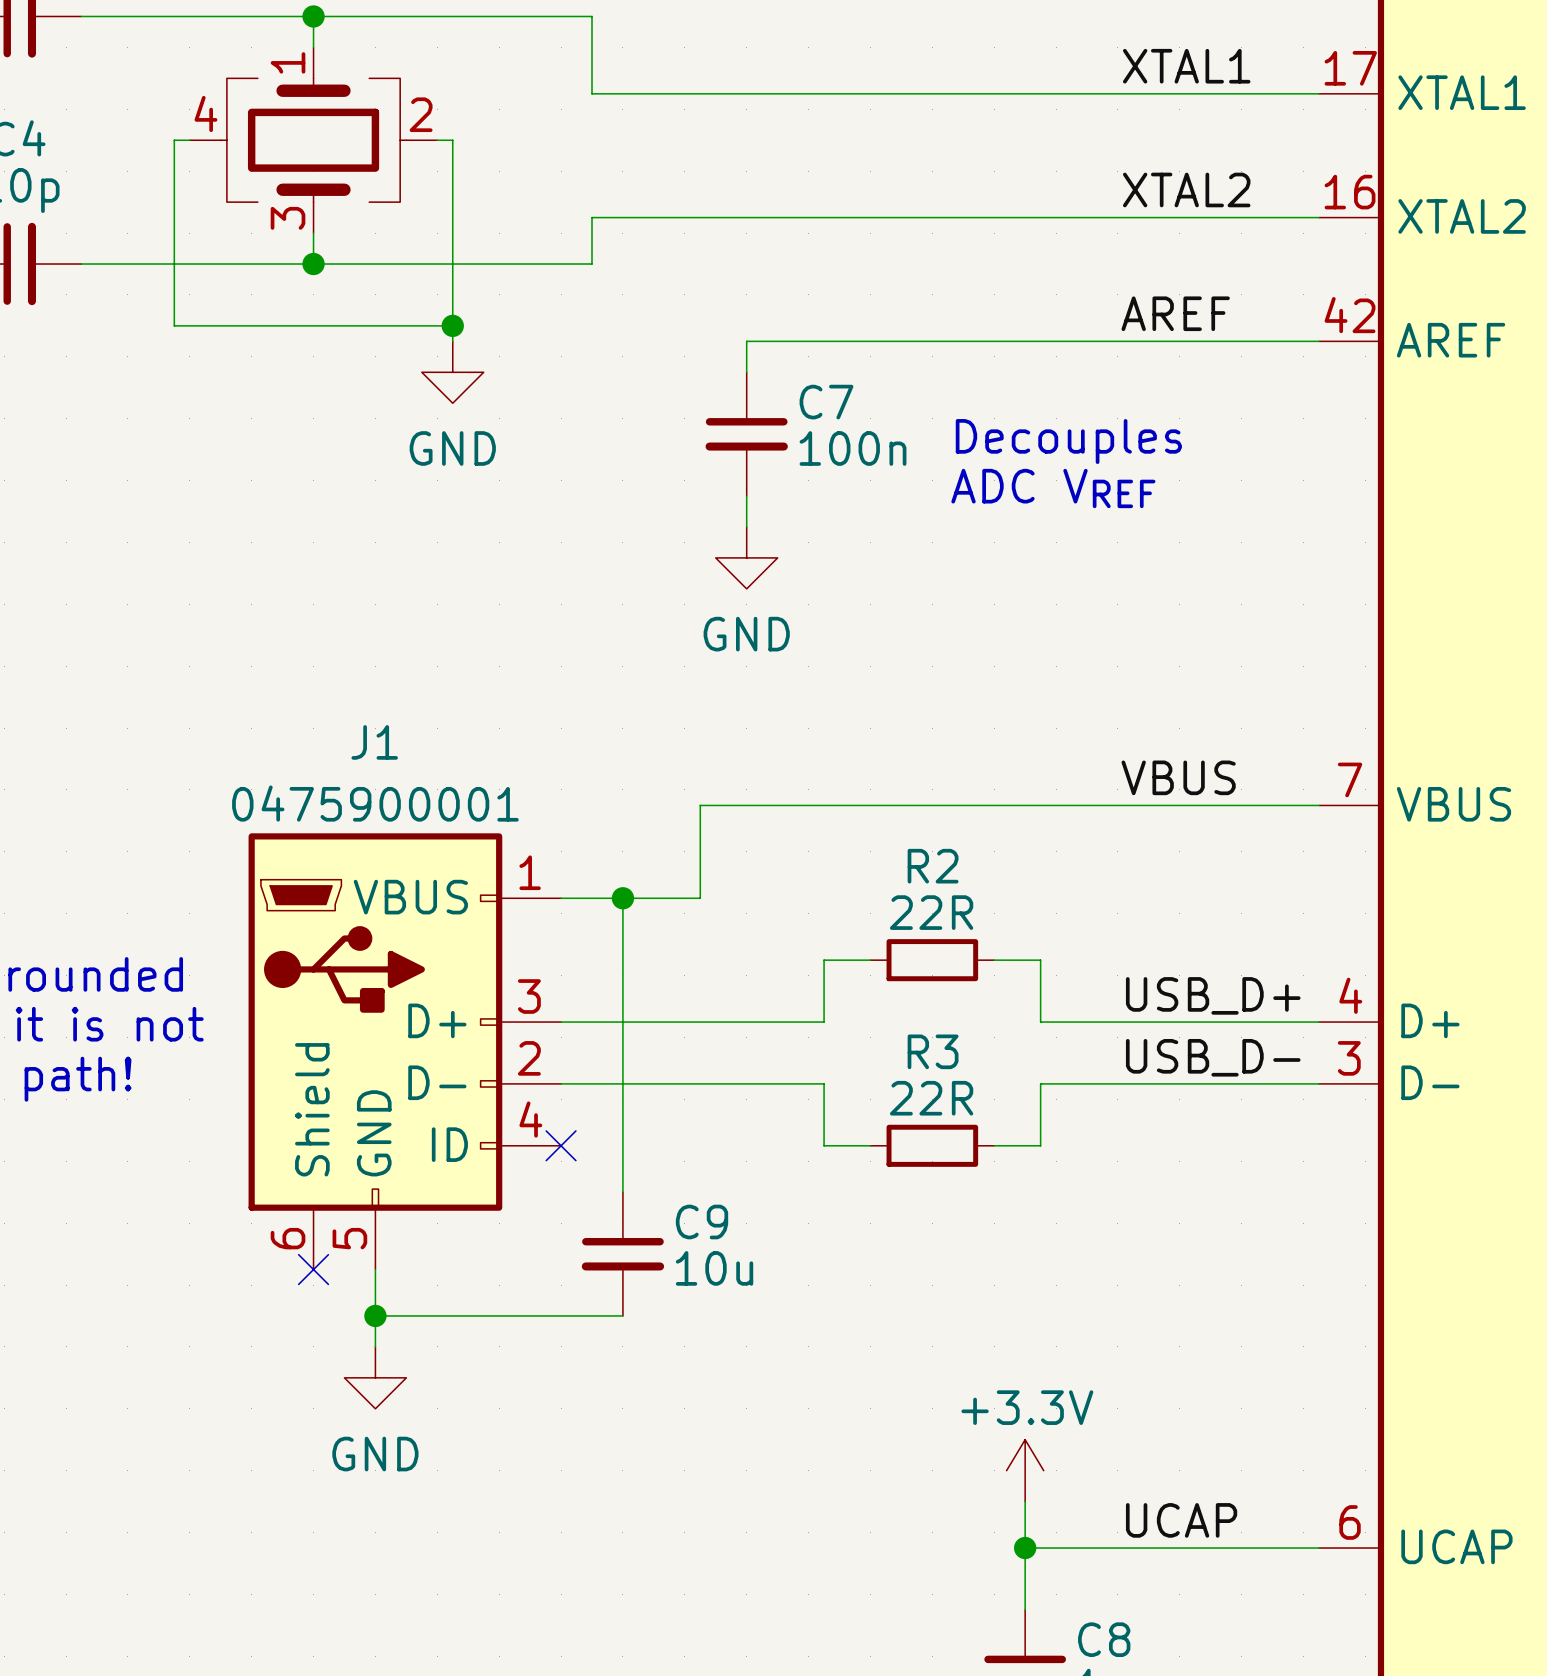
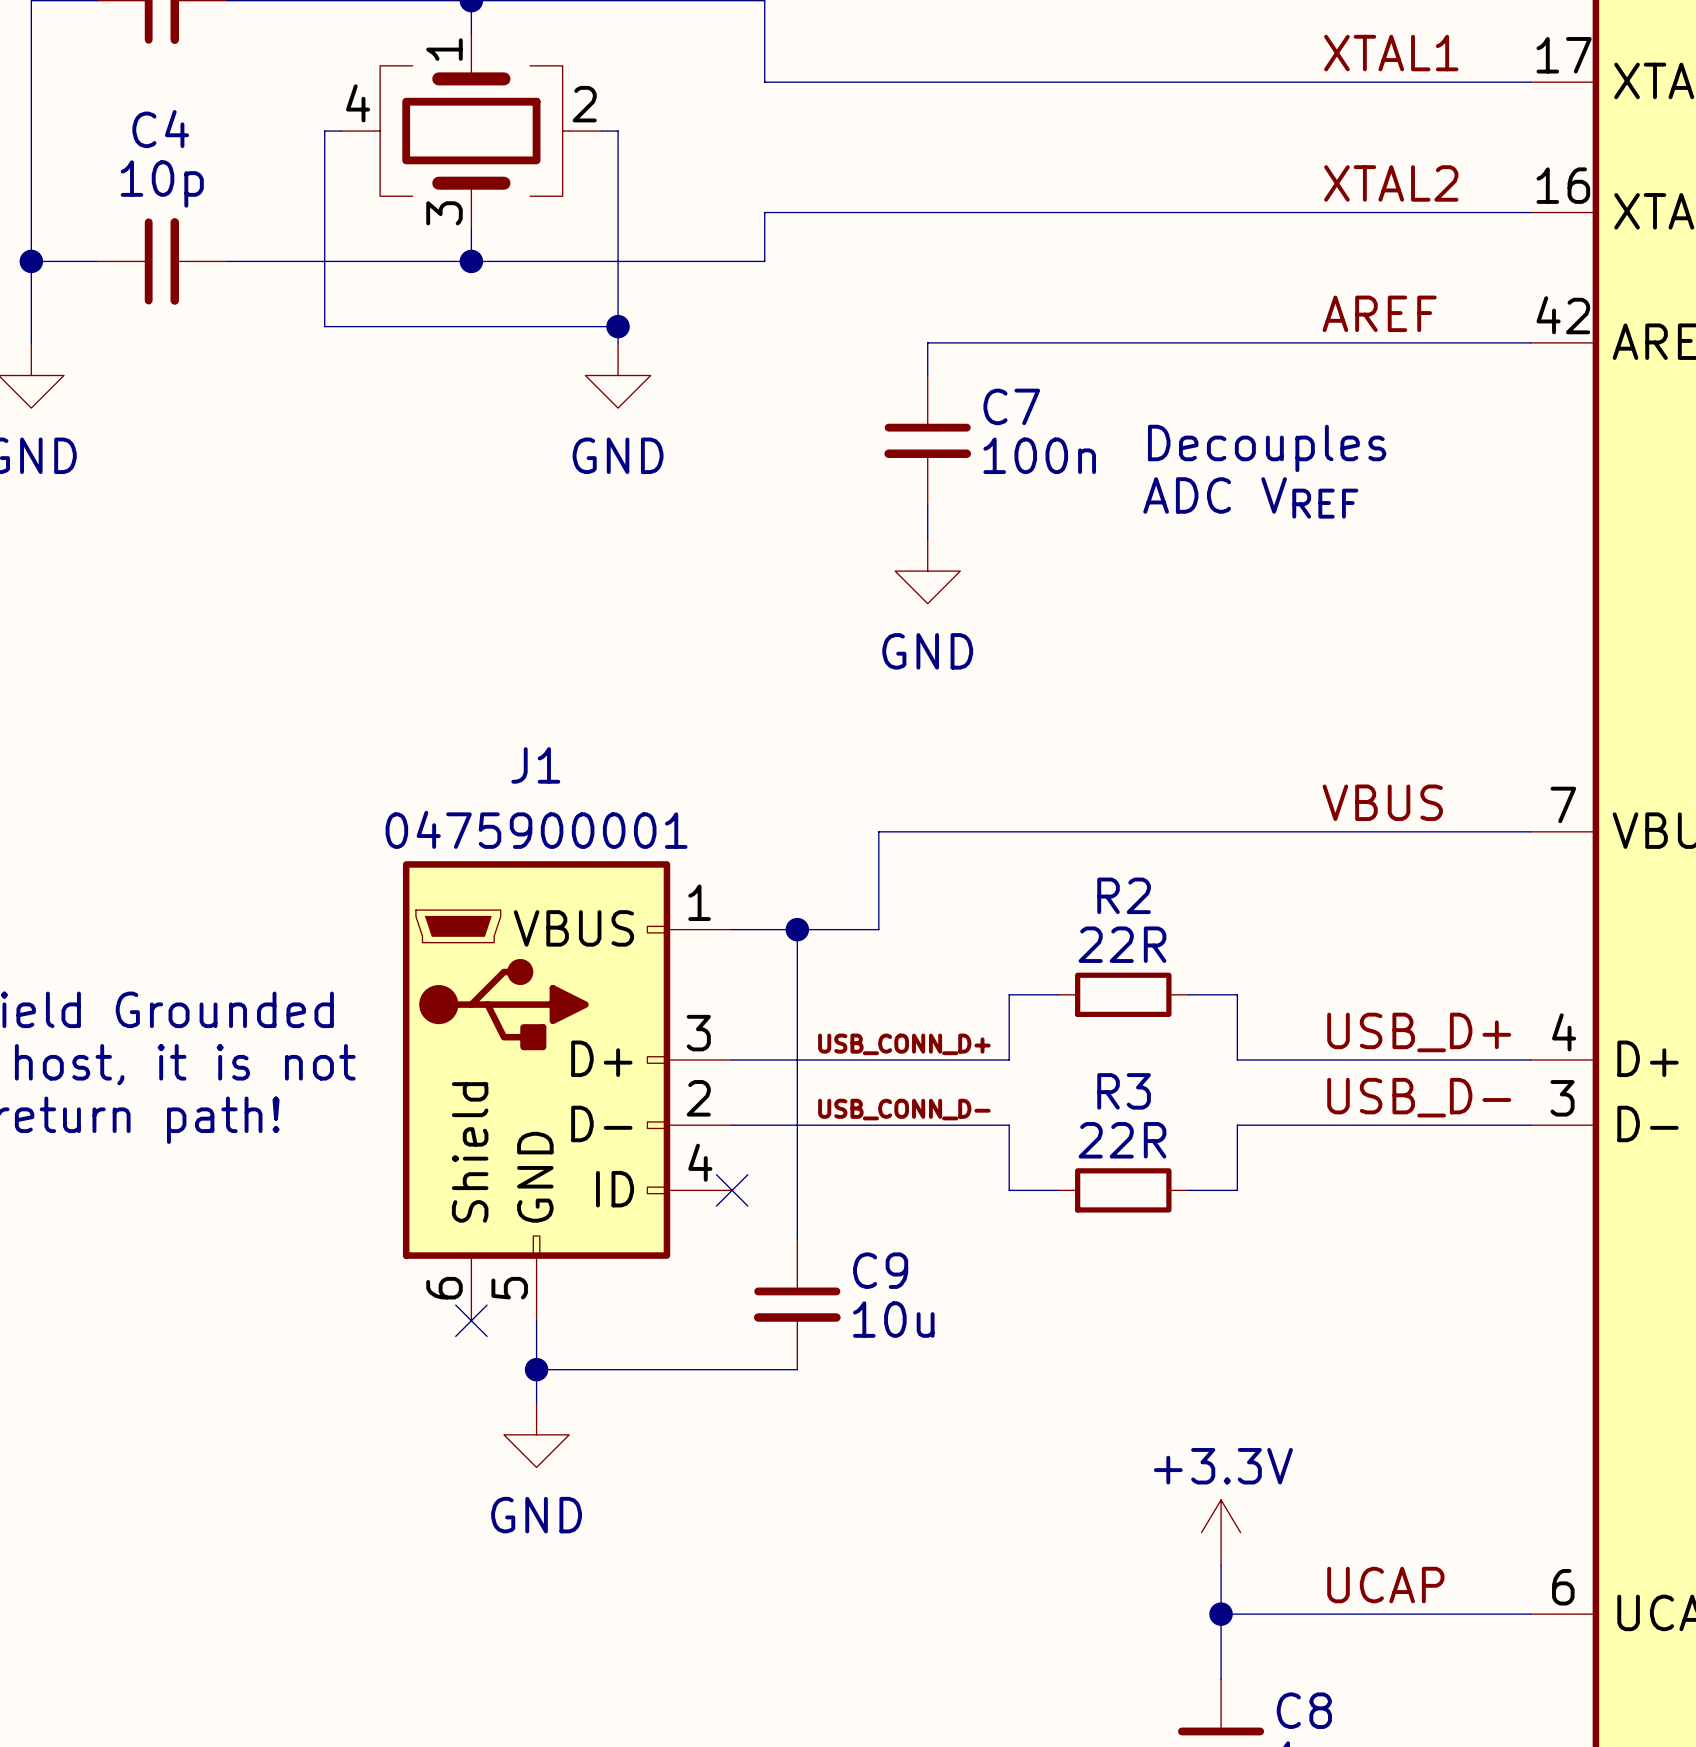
label: none -> USB_CONN_D+ (904, 1044)
label: none -> USB_CONN_D- (904, 1109)

